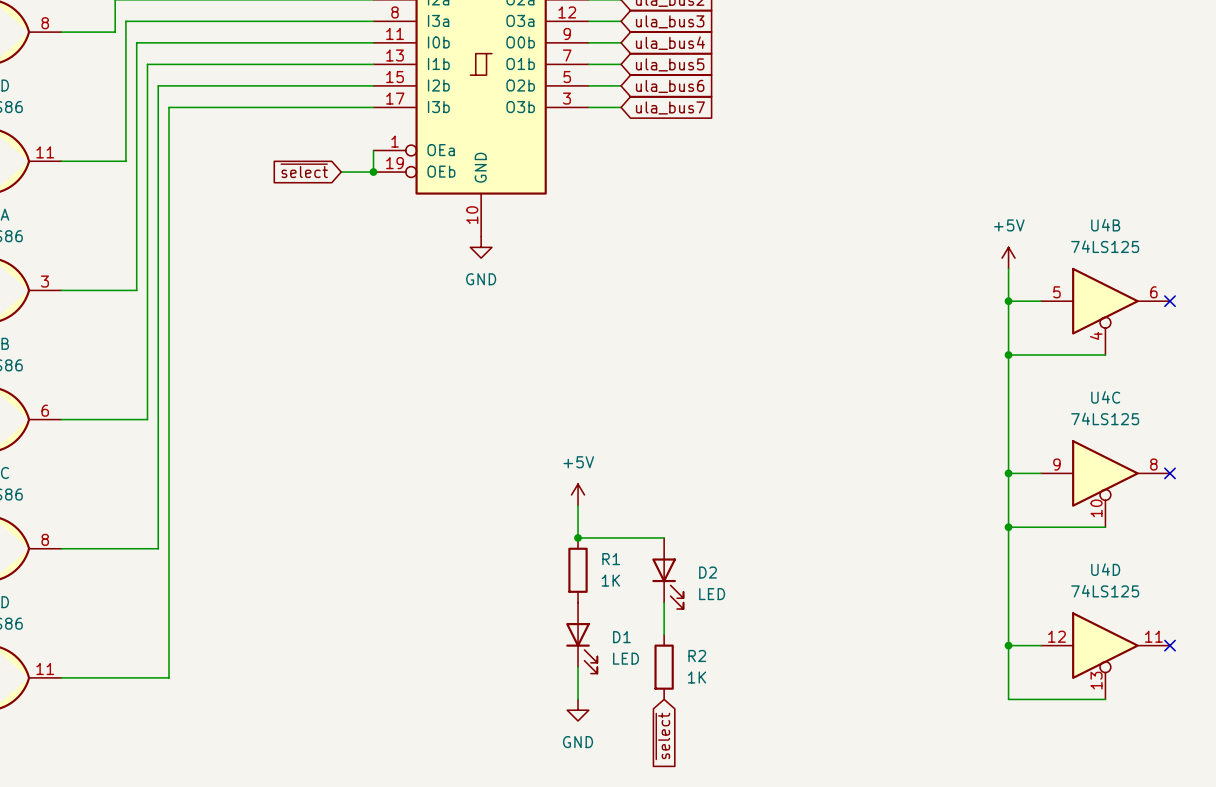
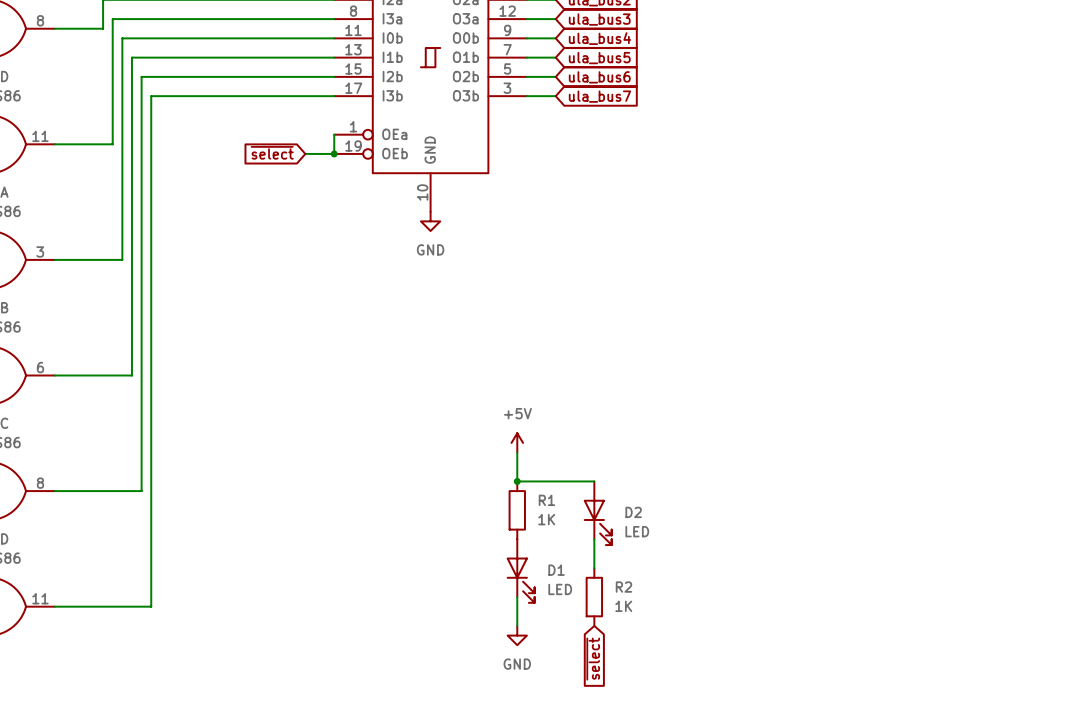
power symbol: +5V (1008, 258) -> none
wire: (1008, 268) (1008, 699) (1105, 699) -> none
wire: (1008, 301) (1040, 301) -> none
junction: (1008, 301) -> none
no-connect mark: (1170, 301) -> none
U4B: 74LS125 (1105, 311) -> none
wire: (1008, 355) (1105, 355) -> none
junction: (1008, 355) -> none
wire: (1008, 473) (1040, 473) -> none
junction: (1008, 473) -> none
no-connect mark: (1170, 473) -> none
U4C: 74LS125 (1105, 483) -> none
wire: (1008, 527) (1105, 527) -> none
junction: (1008, 527) -> none
wire: (1008, 645) (1040, 645) -> none
junction: (1008, 645) -> none
no-connect mark: (1170, 645) -> none
U4D: 74LS125 (1105, 655) -> none

